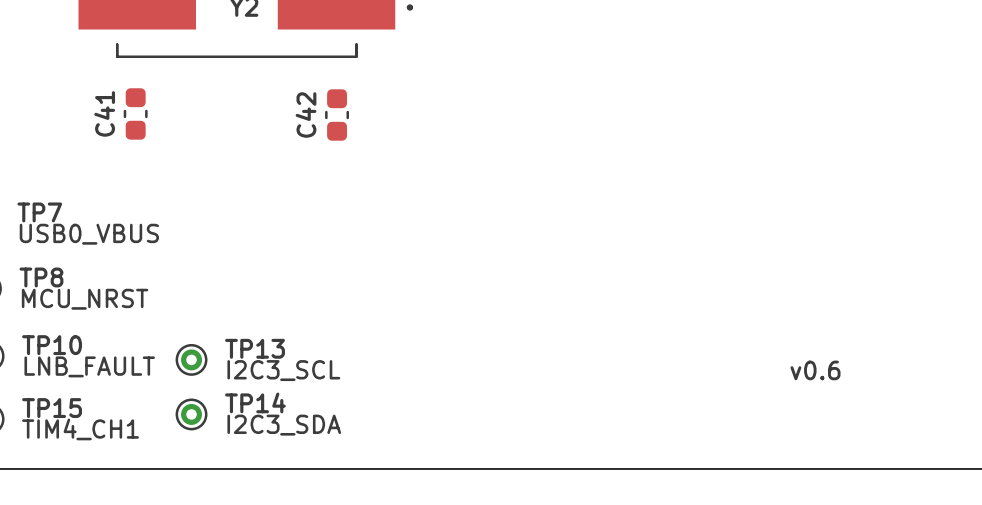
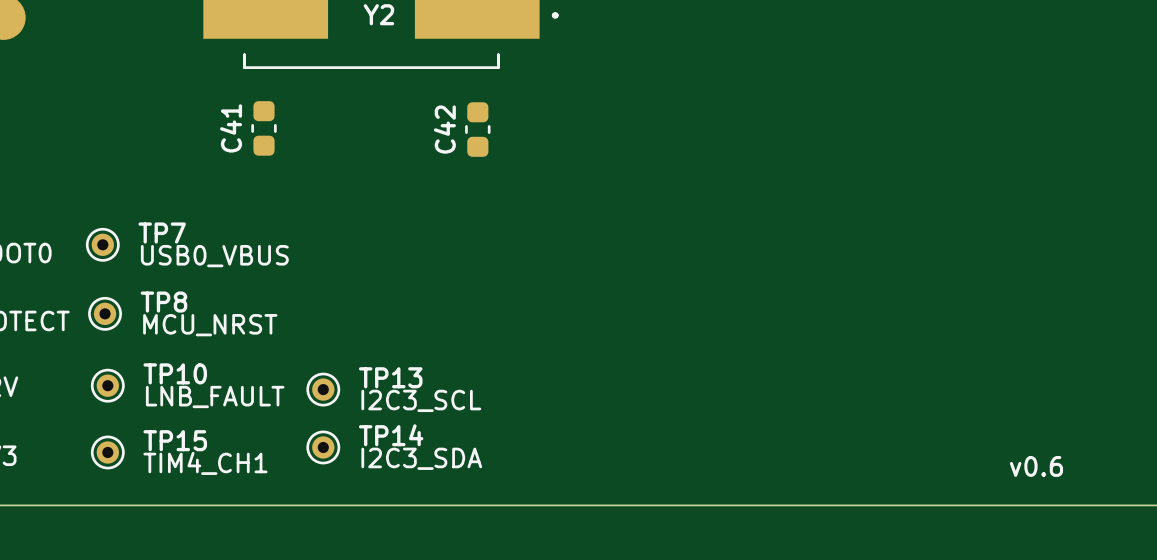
text position: v0.6 (815, 370) -> v0.6 (1036, 466)

